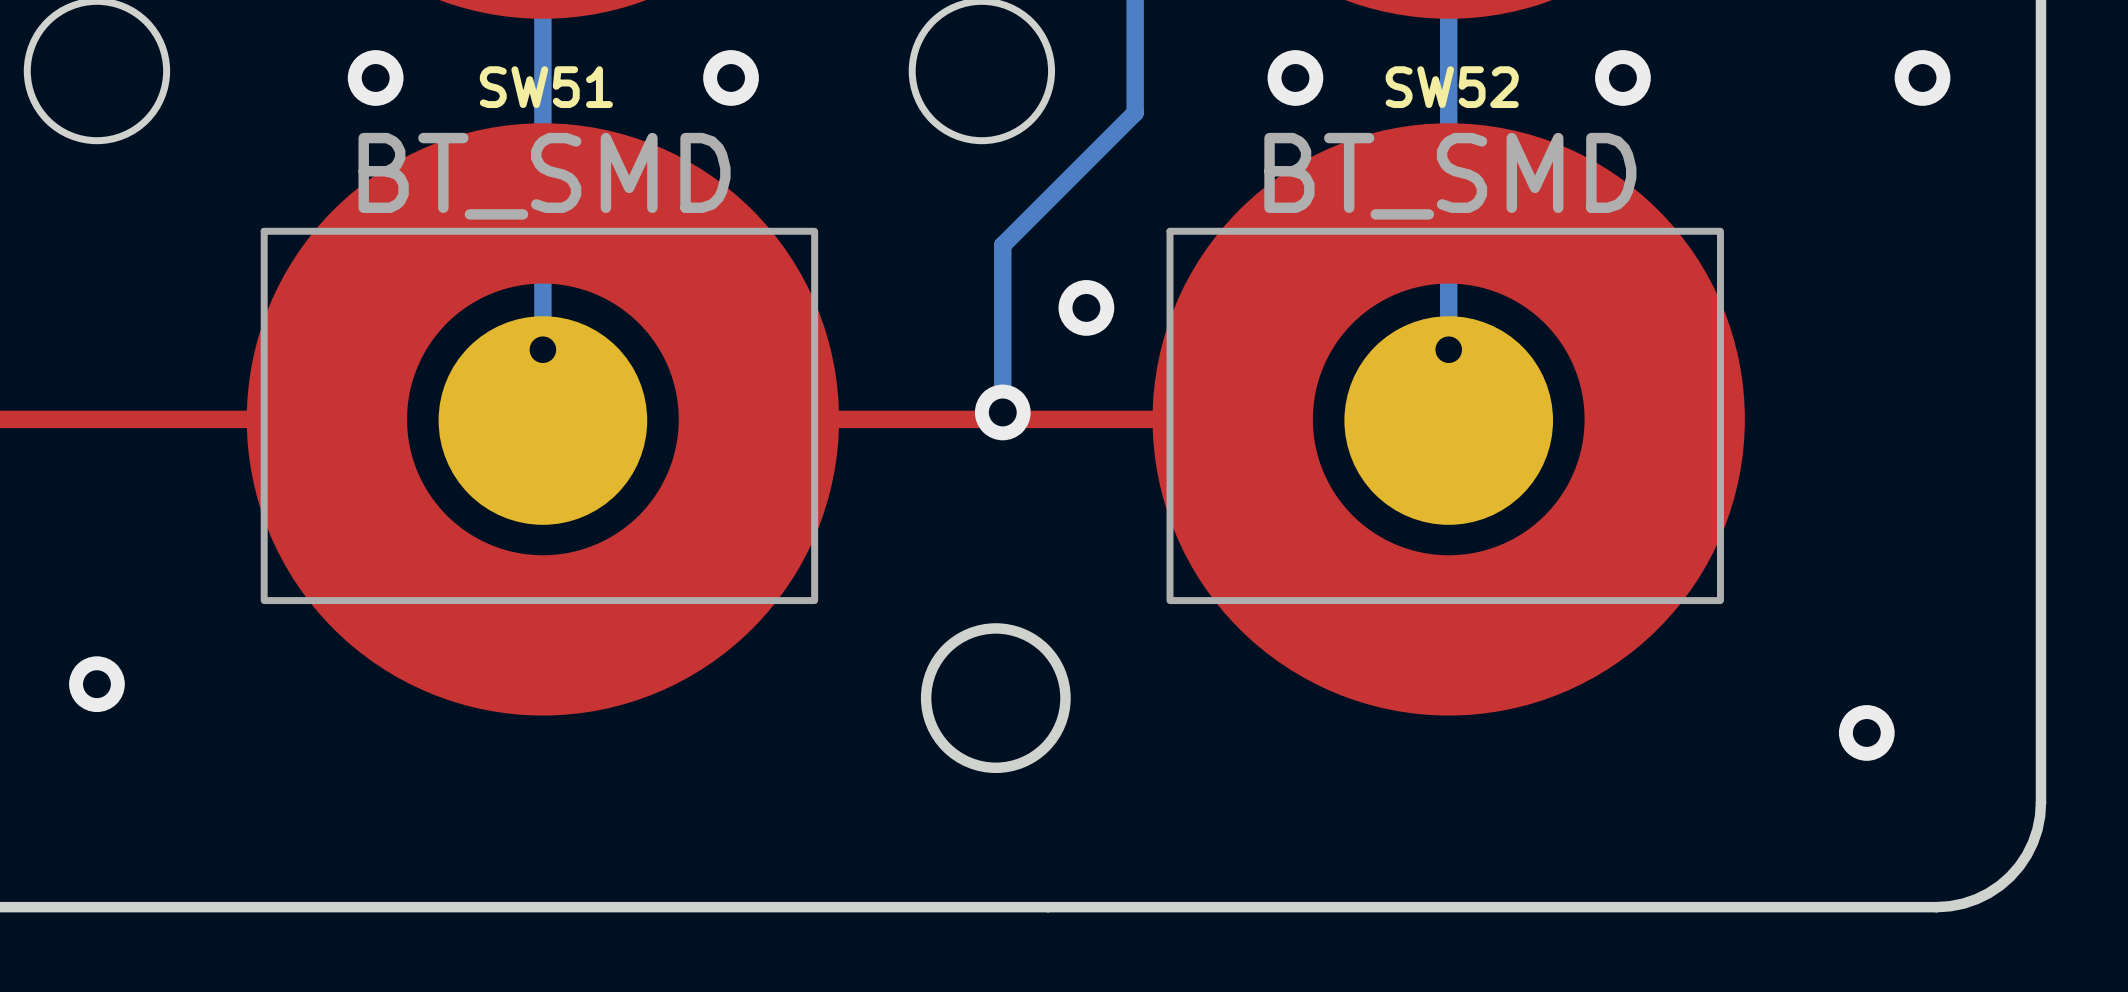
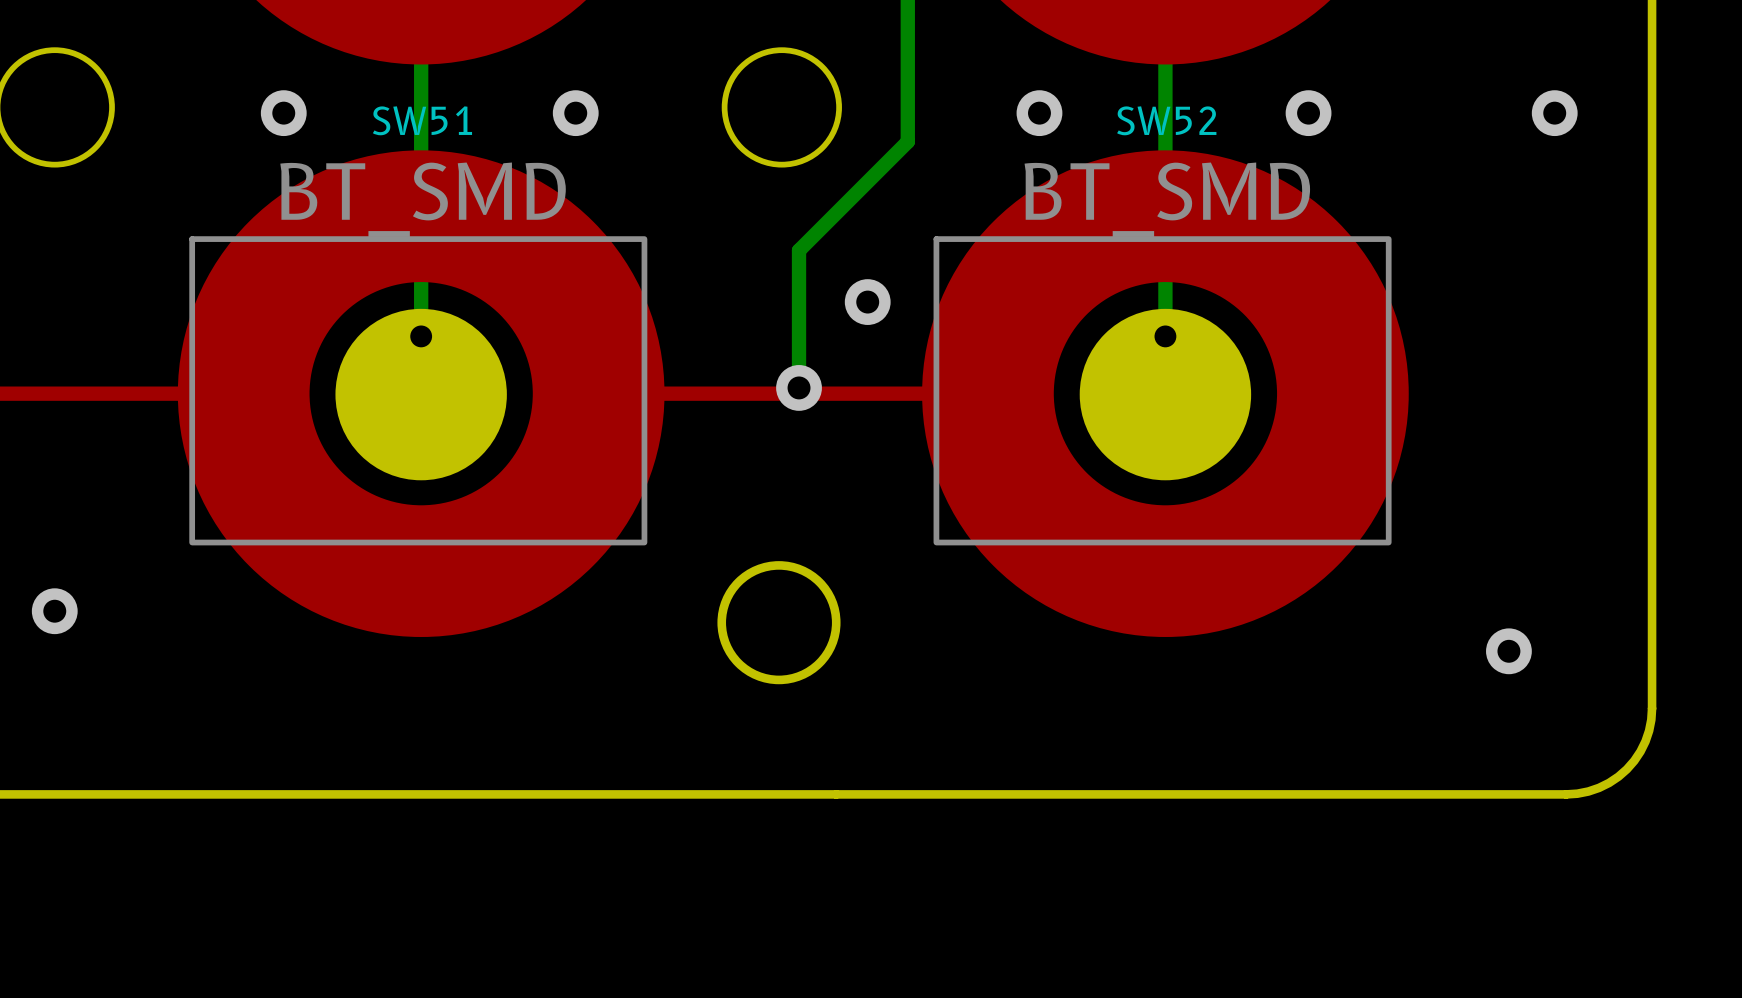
round board edge position: (995, 698) -> (778, 622)

